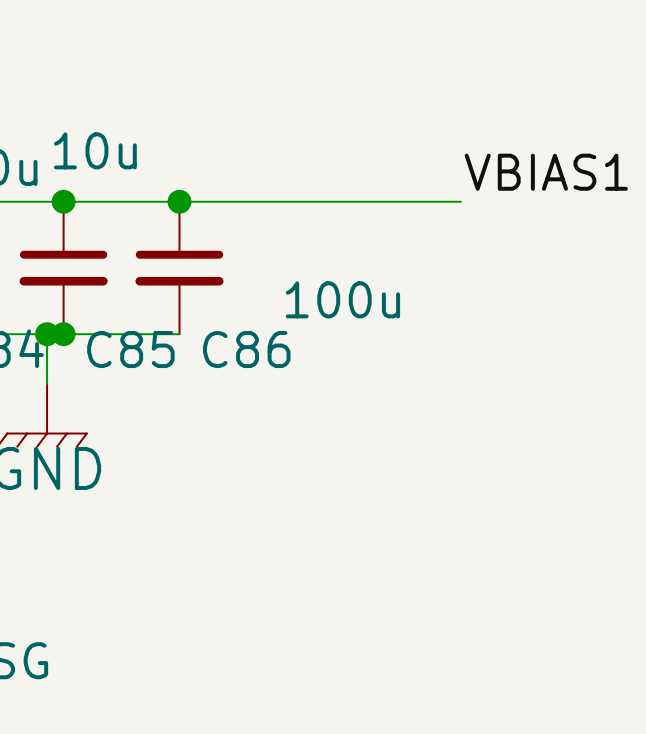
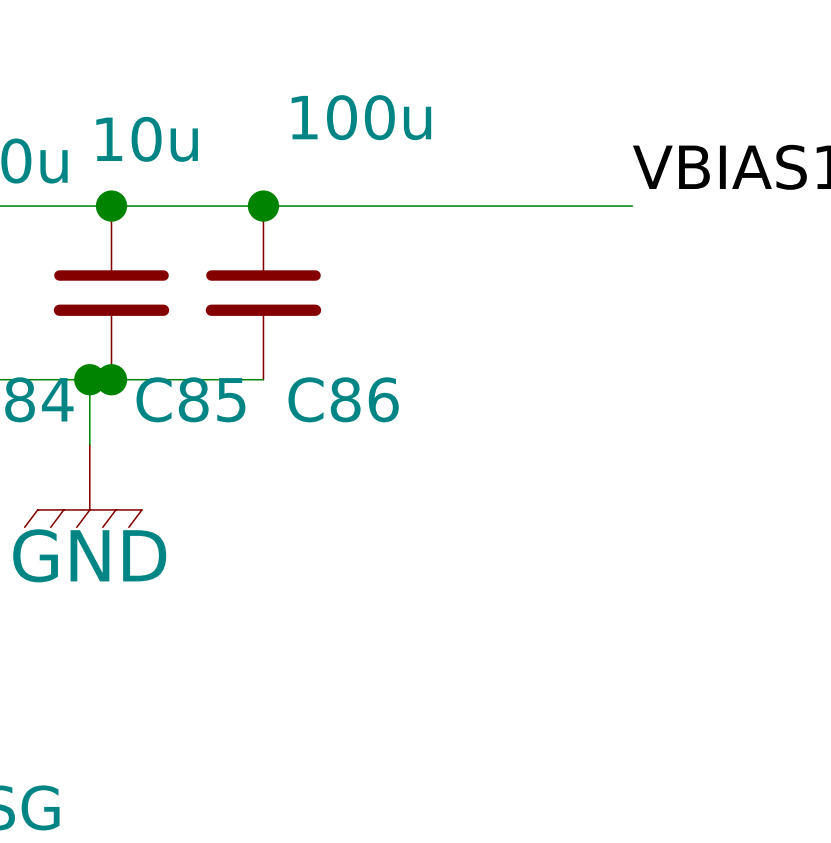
C86 text position: 100u (342, 299) -> 100u (361, 117)

